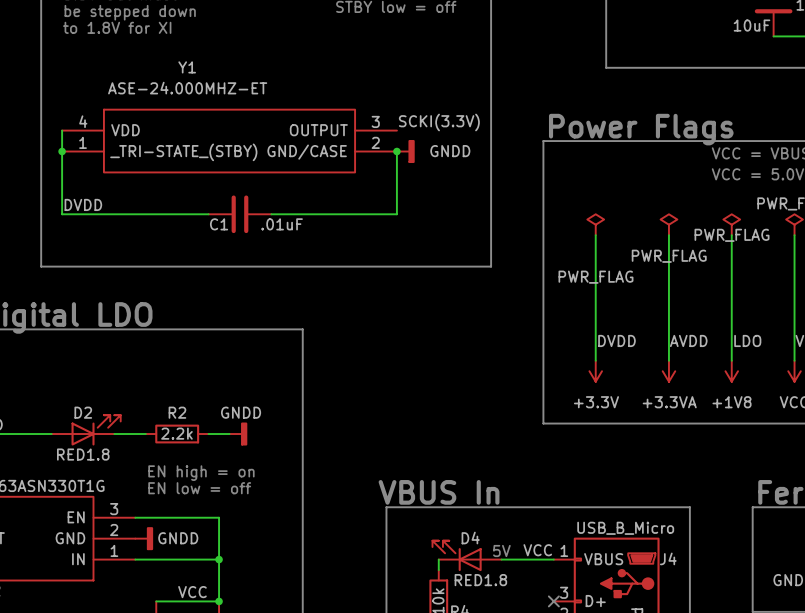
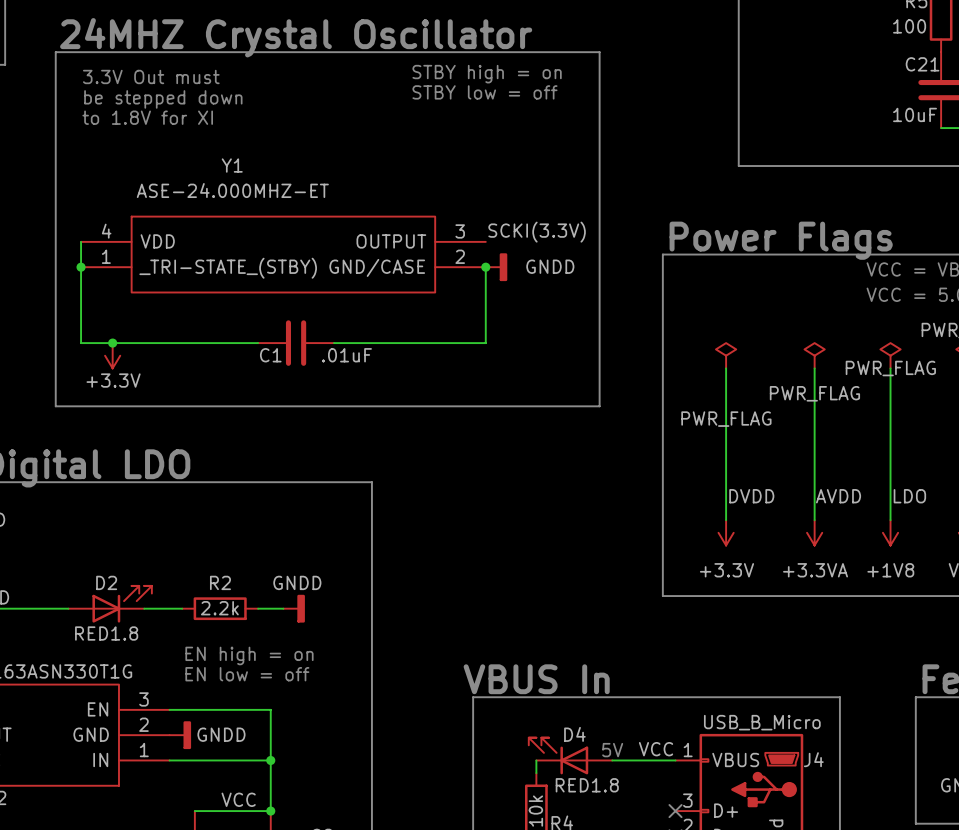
label: DVDD (83, 204) -> none
junction: none -> (112, 343)
power symbol: none -> +3.3V (112, 355)

